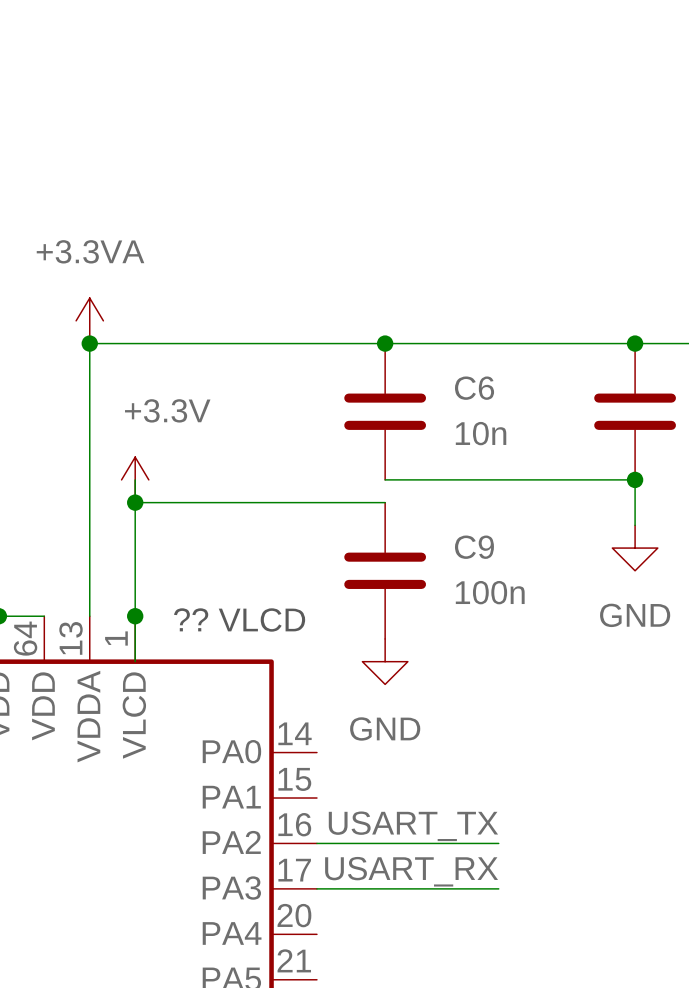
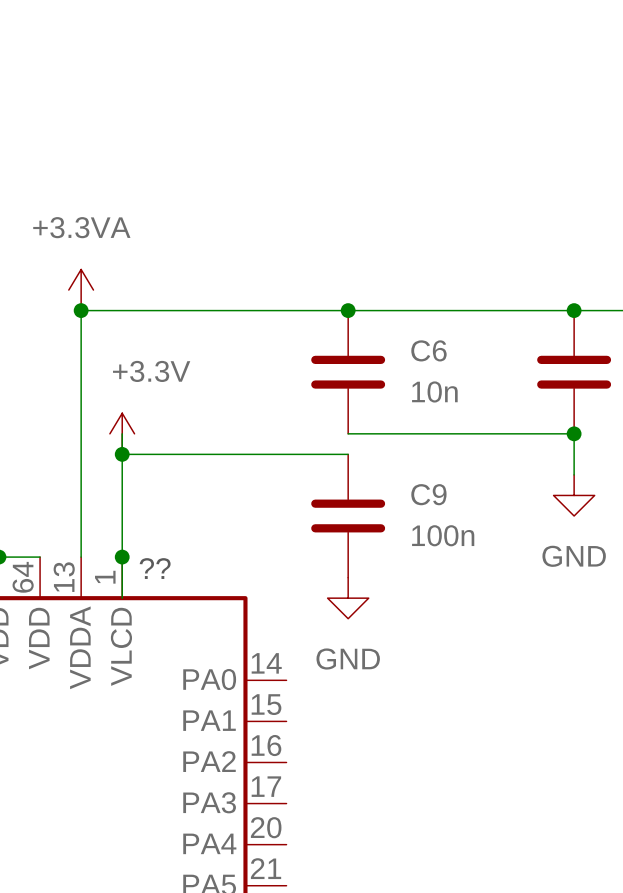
text: ?? VLCD (239, 619) -> none
text: none -> ?? (155, 568)
label: USART_TX (413, 826) -> none
wire: (316, 843) (498, 843) -> none
label: USART_RX (411, 871) -> none
wire: (316, 888) (498, 888) -> none

